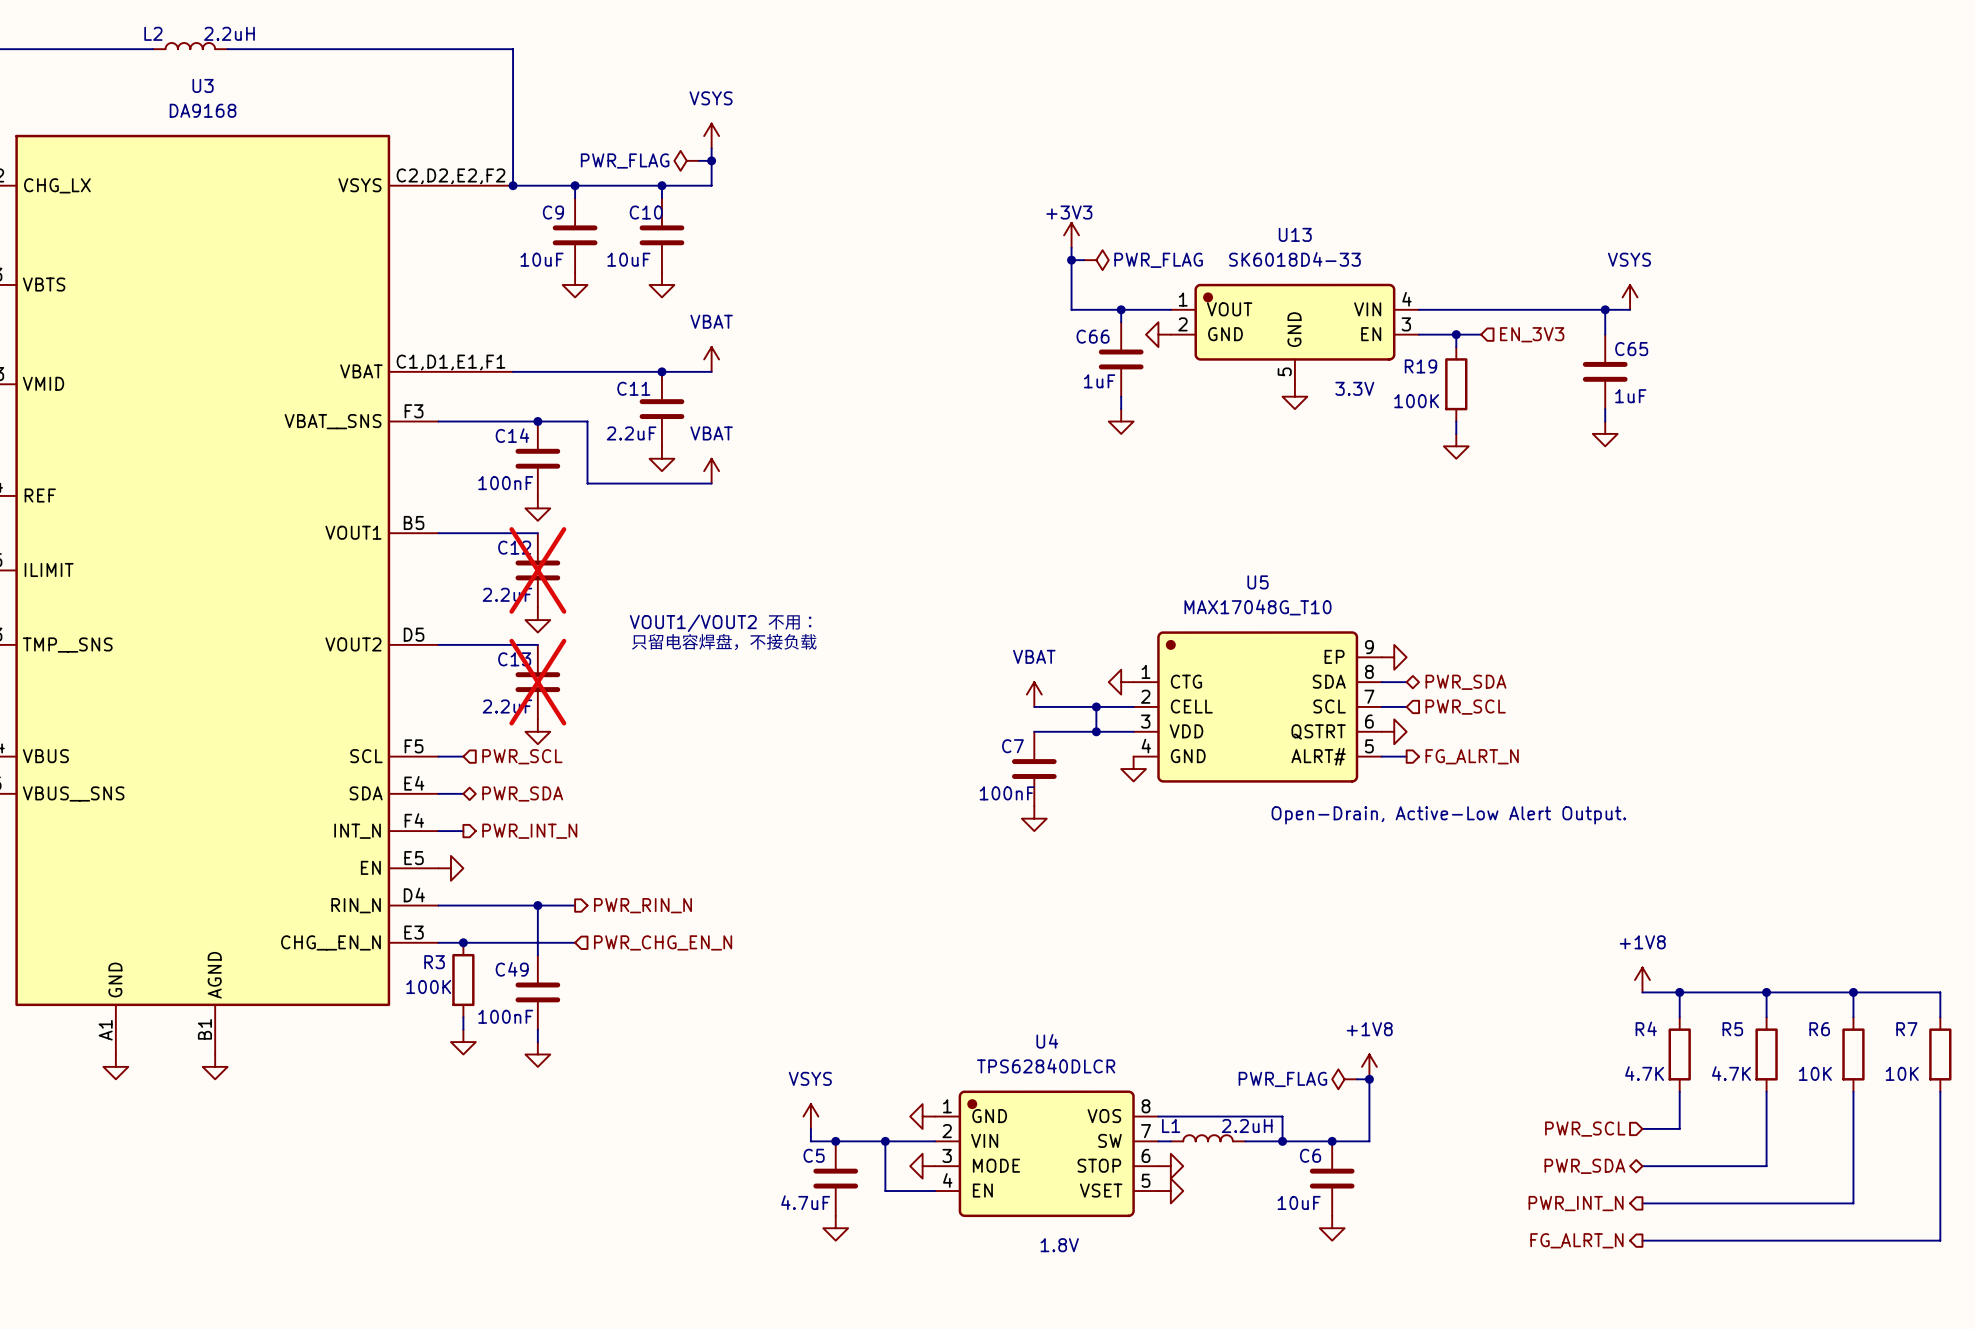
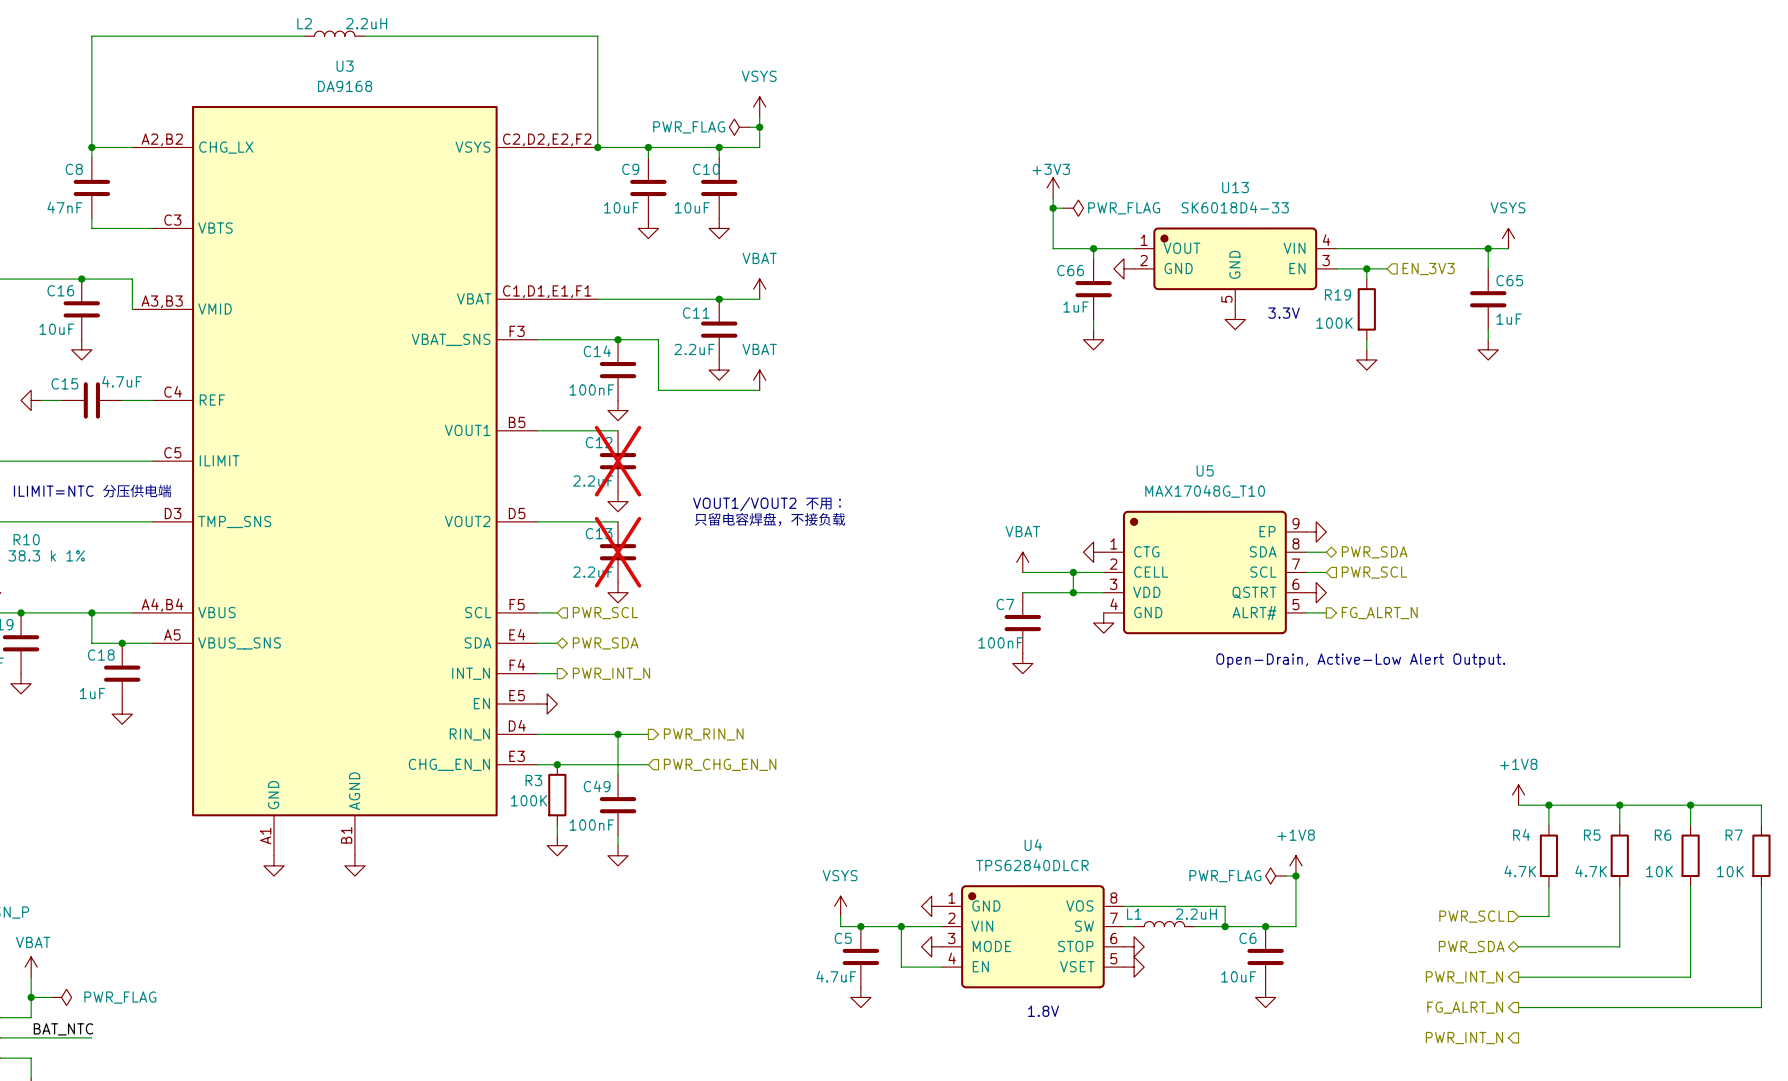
hierarchical label: none -> PWR_INT_N (1464, 1038)

